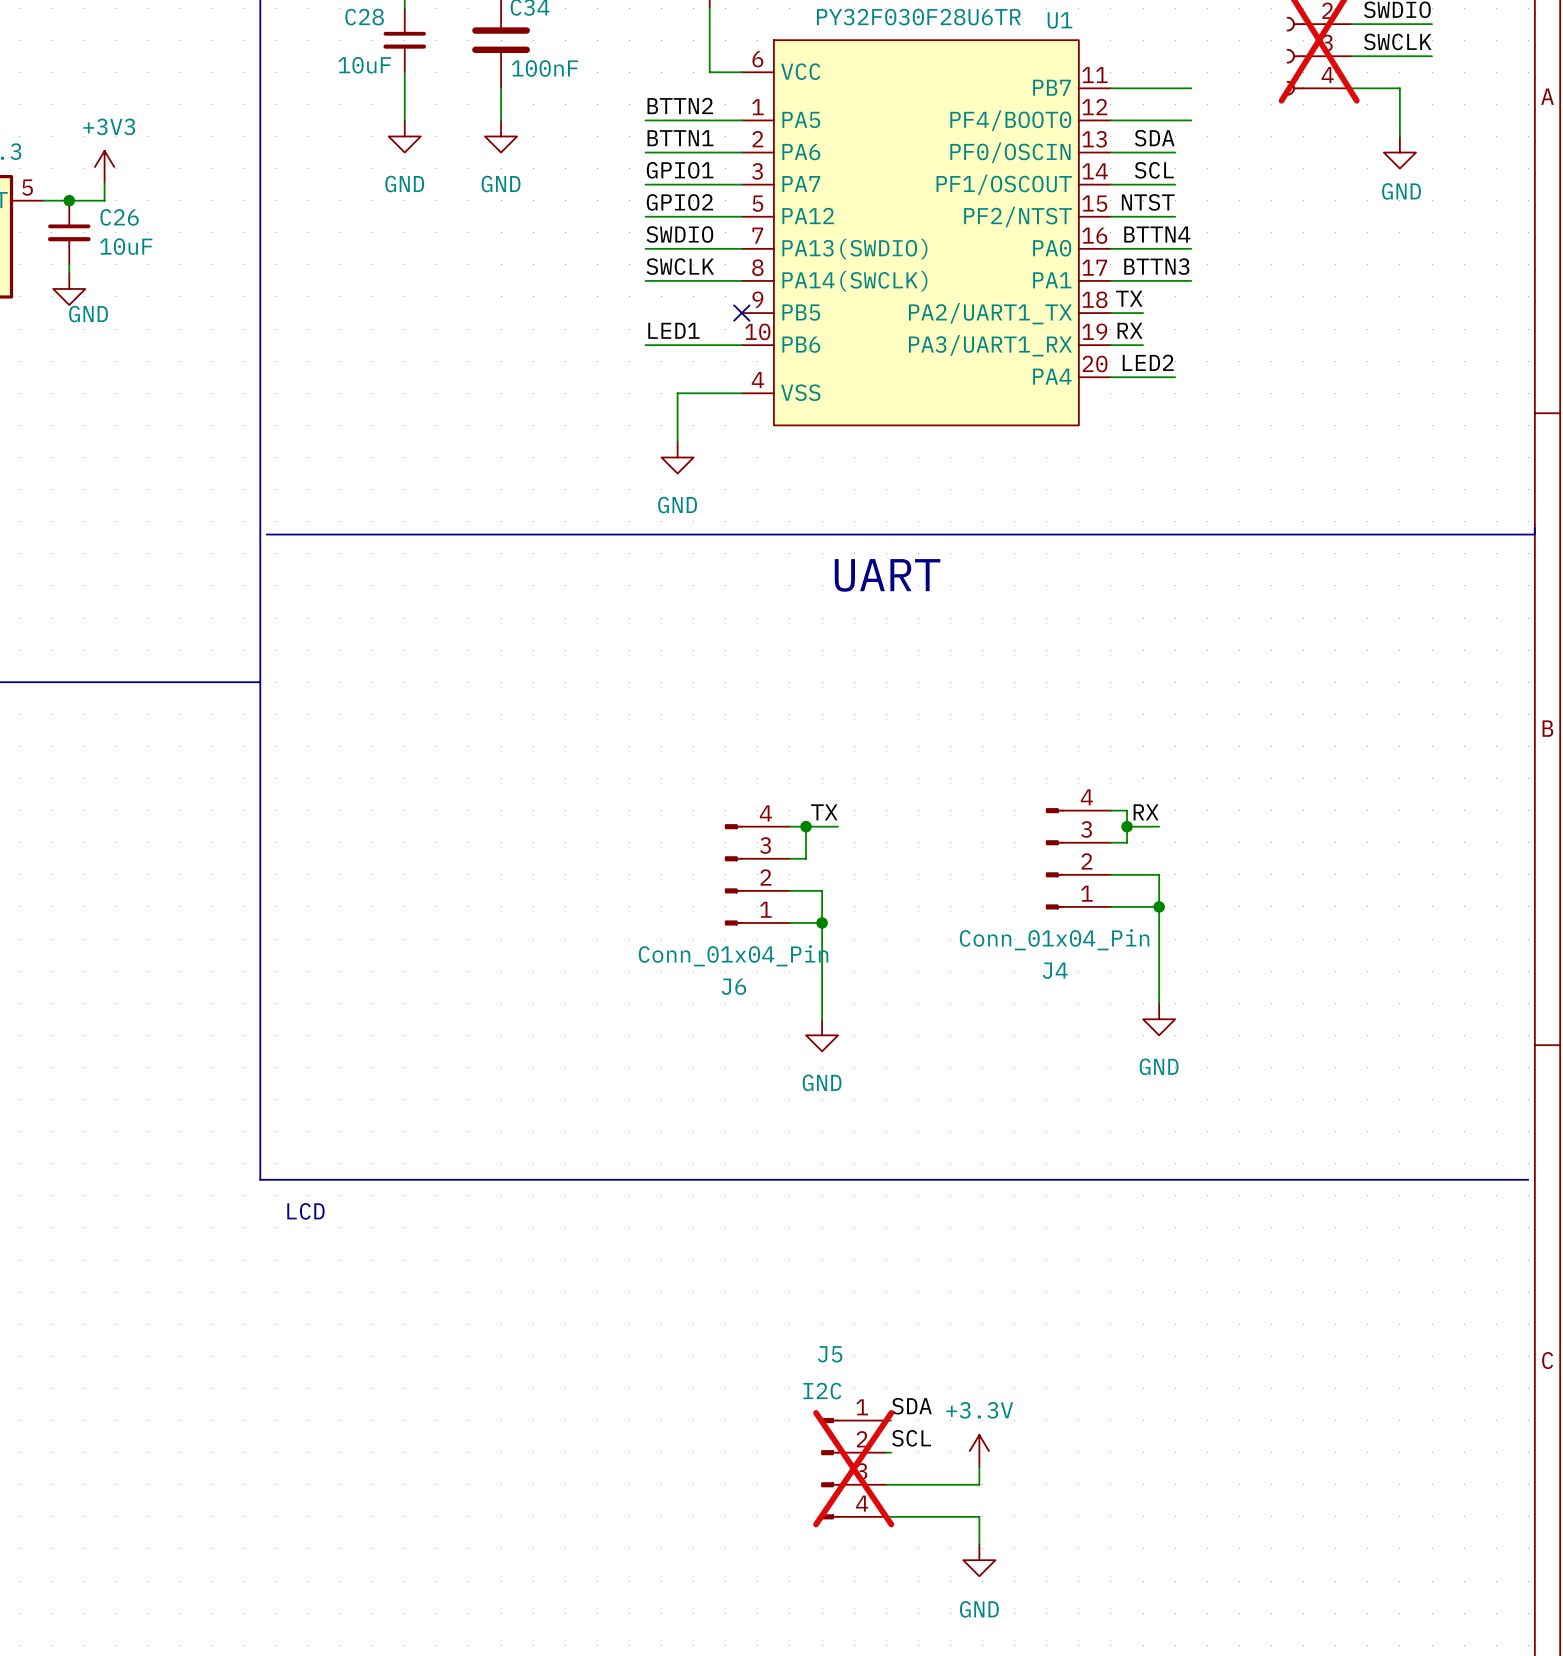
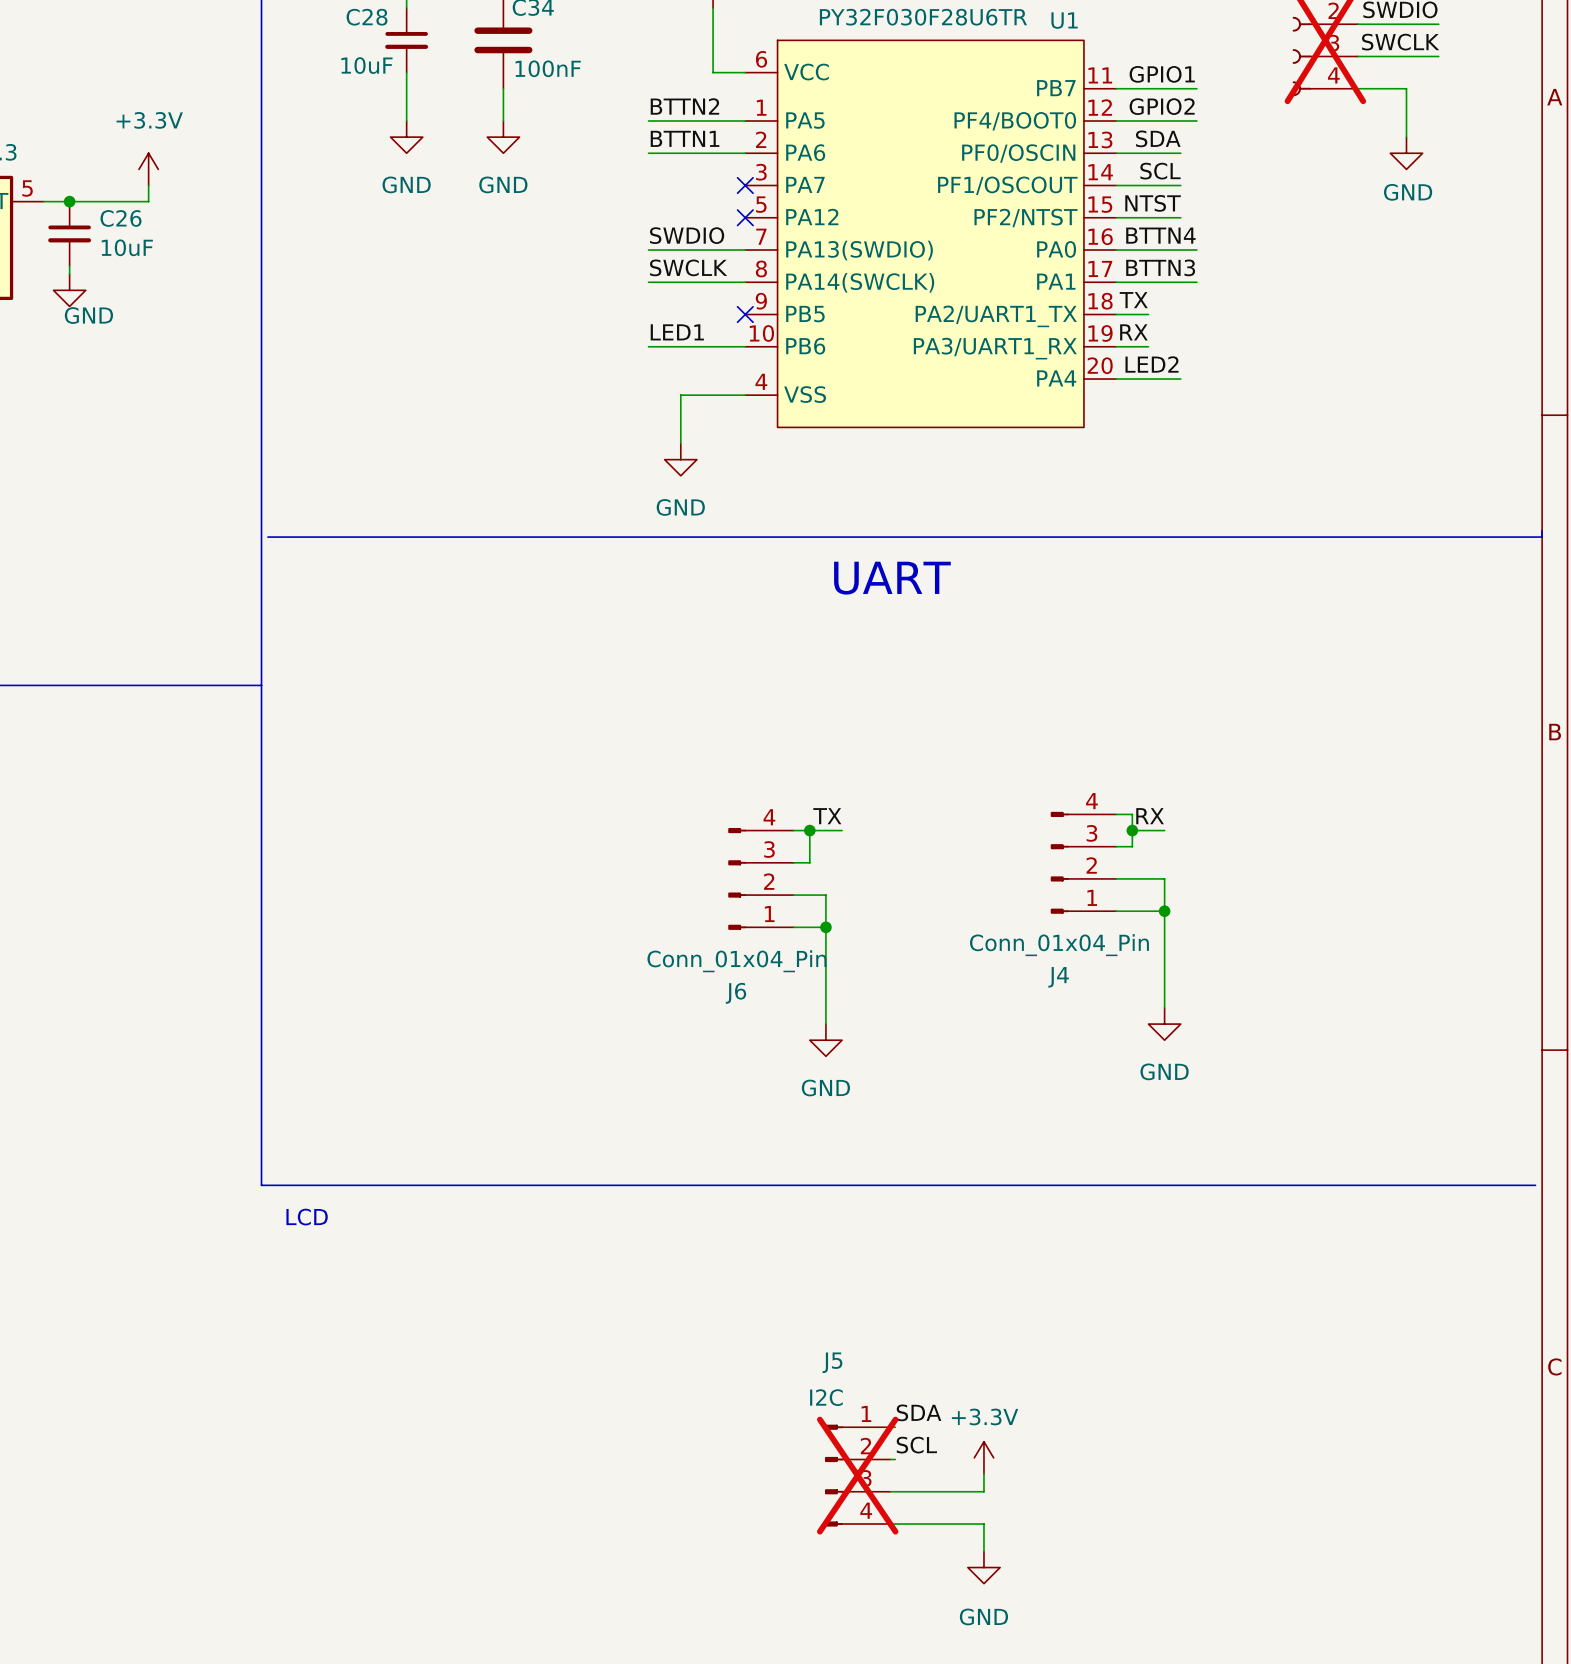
label: none -> GPIO1 (1162, 74)
label: none -> GPIO2 (1162, 106)
power symbol: +3V3 (104, 166) -> none
power symbol: none -> +3.3V (148, 169)
label: GPIO1 (680, 170) -> none
wire: (104, 183) (104, 200) -> (148, 185) (148, 201) (105, 201)
wire: (645, 184) (741, 184) -> none
no-connect mark: none -> (745, 185)
label: GPIO2 (679, 202) -> none
wire: (645, 216) (741, 216) -> none
no-connect mark: none -> (745, 217)

